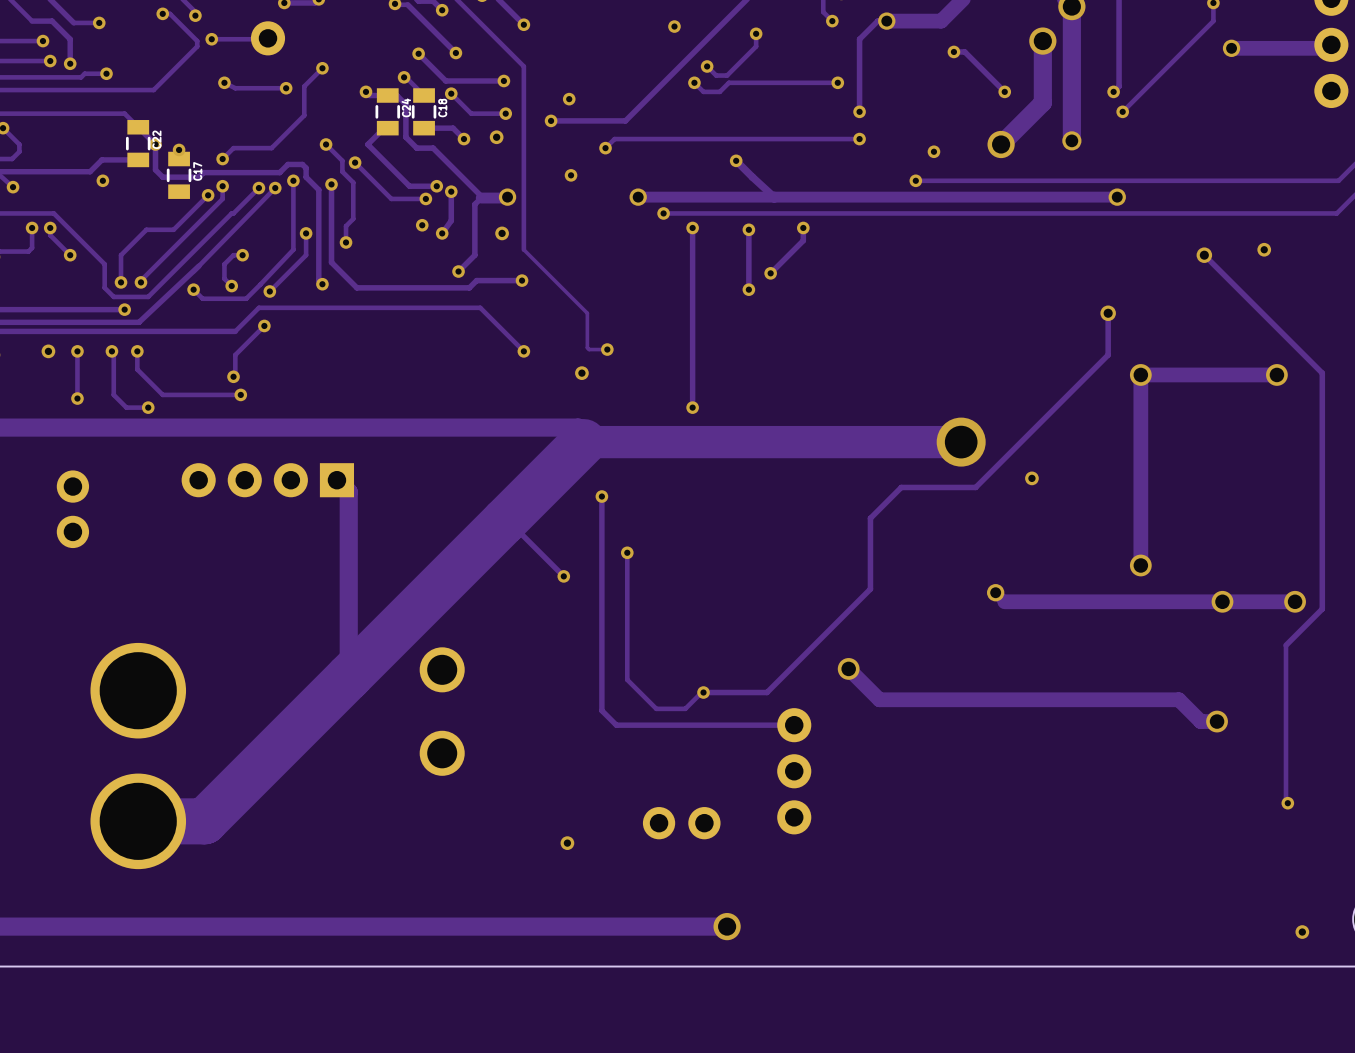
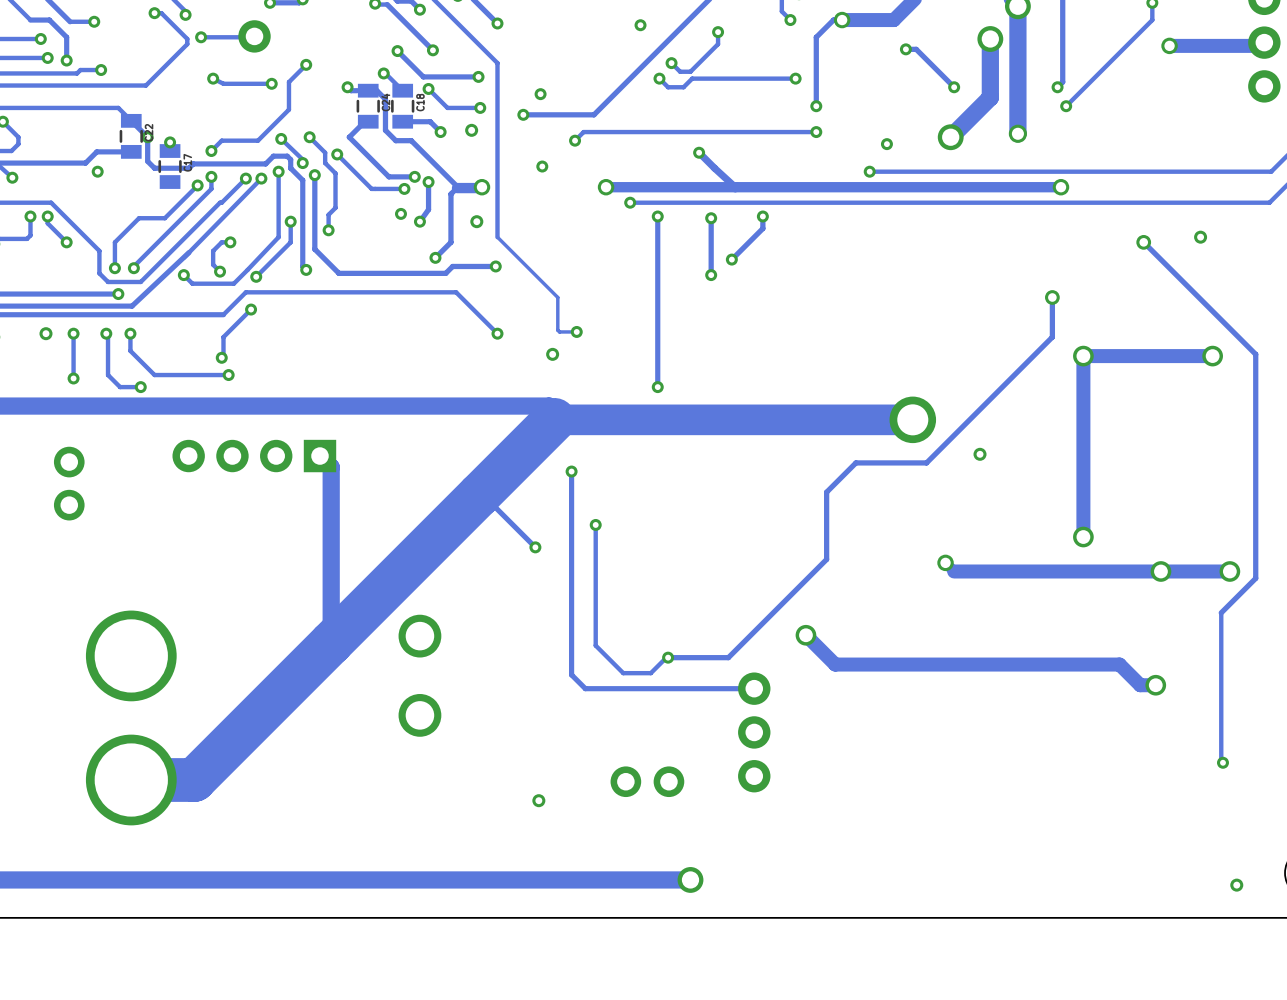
track: none -> (281, 138) (302, 159) (302, 163)
via: none -> (281, 138)
via: none -> (302, 163)

